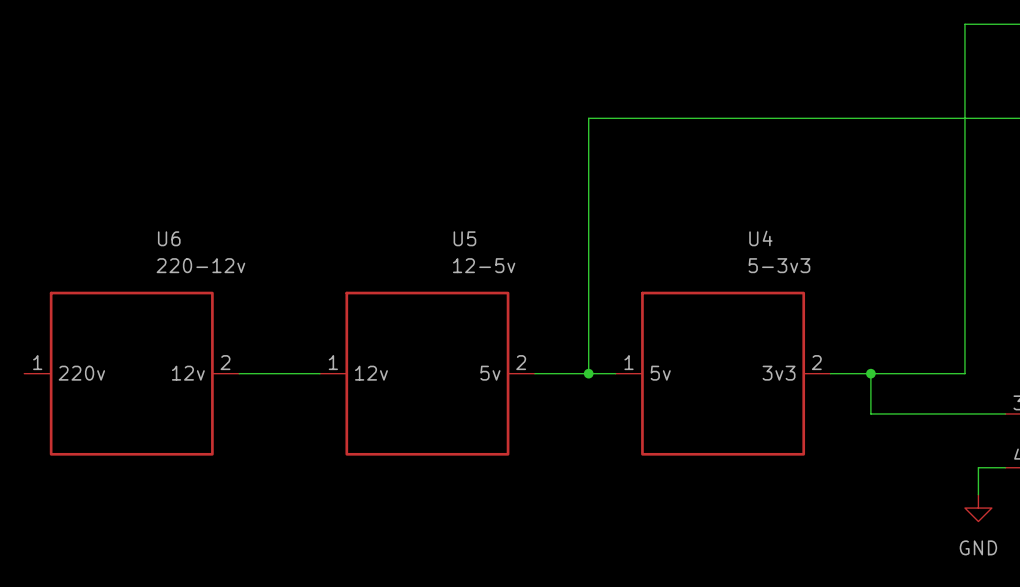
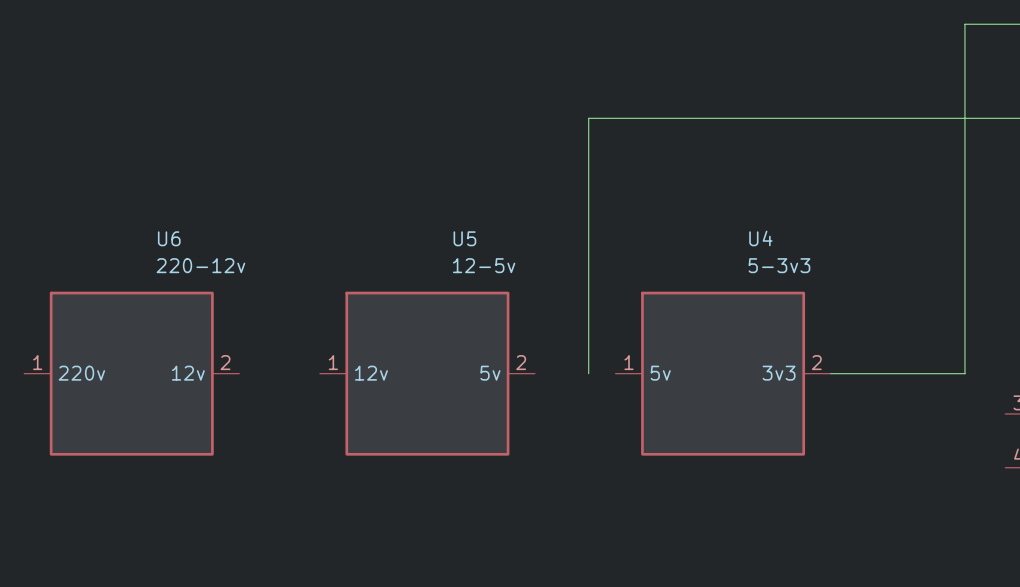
wire: (239, 373) (319, 373) -> none
wire: (534, 373) (615, 373) -> none
junction: (588, 373) -> none
wire: (870, 373) (870, 413) (1005, 413) -> none
junction: (870, 373) -> none
wire: (1005, 467) (978, 467) (978, 494) -> none
power symbol: GND (978, 508) -> none

